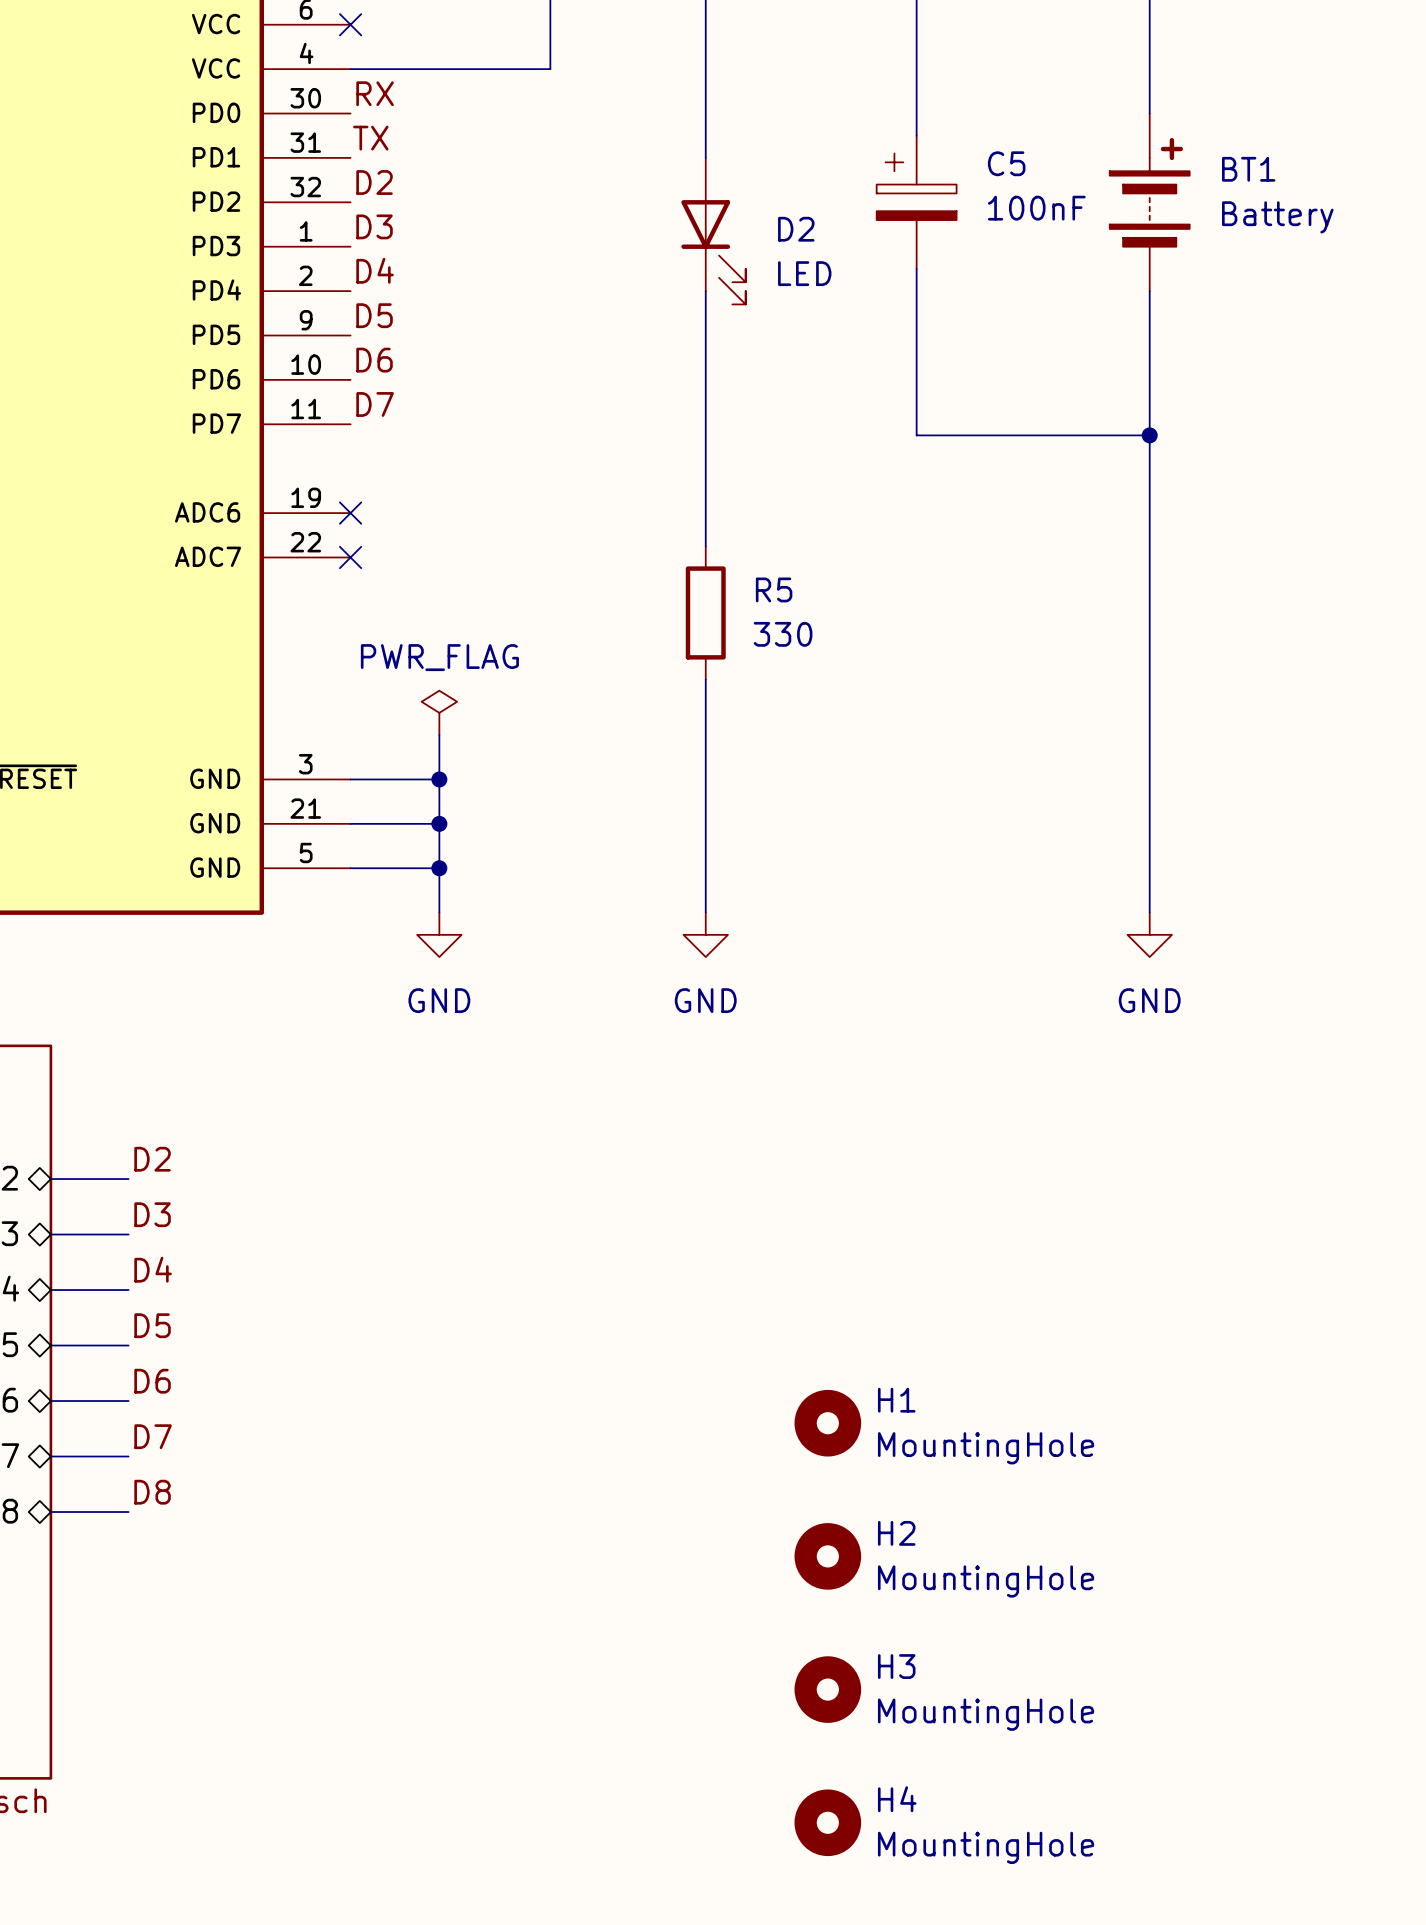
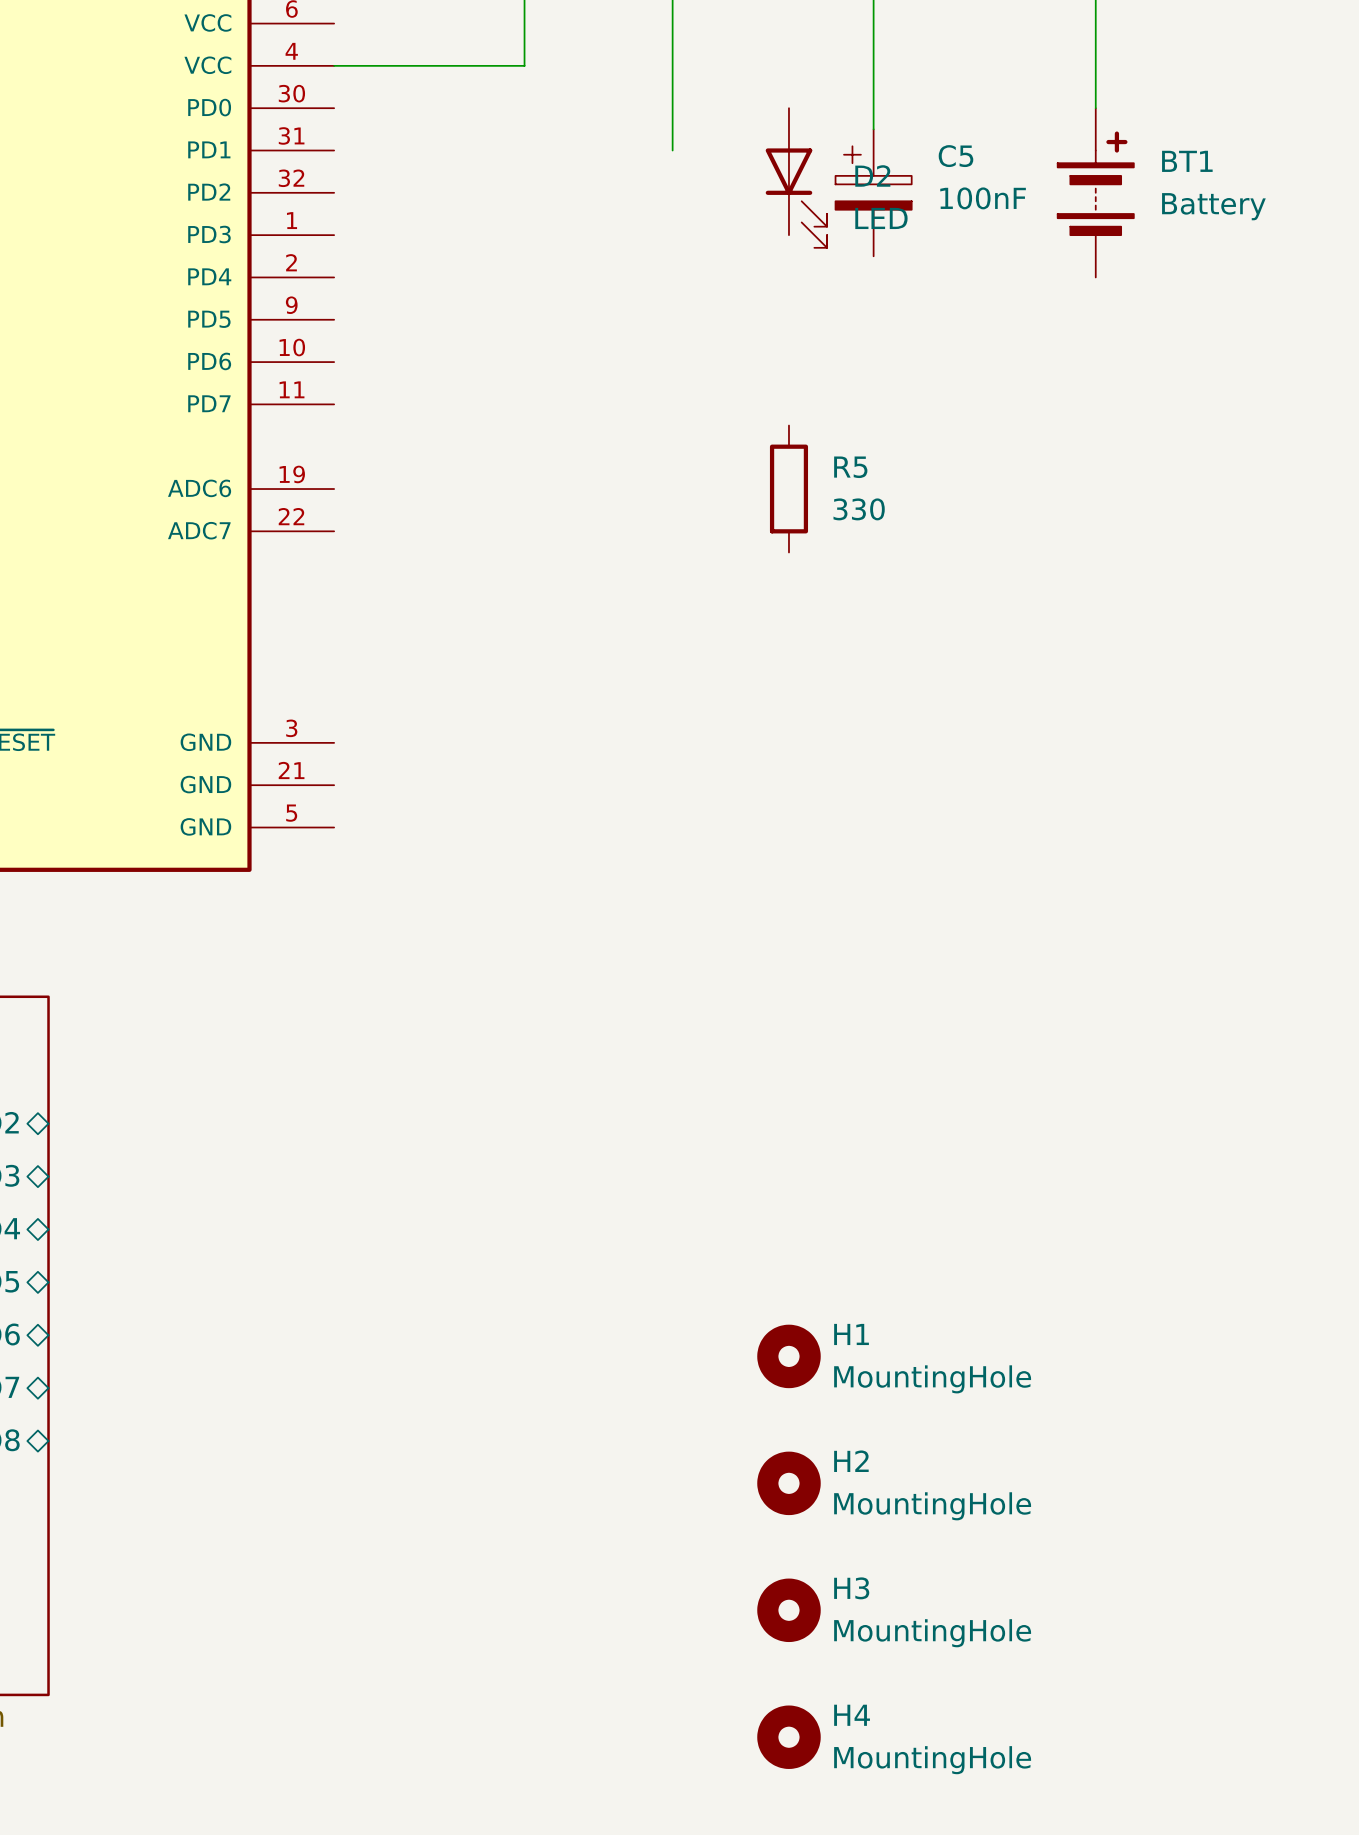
no-connect mark: (350, 24) -> none
label: RX (375, 93) -> none
label: TX (370, 138) -> none
label: D2 (374, 182) -> none
label: D3 (374, 226) -> none
D2 position: (713, 231) -> (796, 178)
wire: (916, 268) (916, 435) (1149, 435) -> none
label: D4 (375, 270) -> none
wire: (705, 291) (705, 546) -> none
wire: (1149, 291) (1149, 912) -> none
label: D5 (374, 315) -> none
label: D6 (374, 360) -> none
label: D7 (375, 404) -> none
junction: (1149, 435) -> none
no-connect mark: (350, 513) -> none
no-connect mark: (350, 557) -> none
R5 position: (705, 612) -> (788, 489)
wire: (705, 679) (705, 912) -> none
power symbol: PWR_FLAG (439, 712) -> none
wire: (439, 735) (439, 912) -> none
wire: (350, 779) (439, 779) -> none
junction: (439, 779) -> none
wire: (350, 823) (439, 823) -> none
junction: (439, 823) -> none
wire: (350, 868) (439, 868) -> none
junction: (439, 868) -> none
power symbol: GND (439, 934) -> none
power symbol: GND (705, 934) -> none
power symbol: GND (1149, 934) -> none
label: D2 (152, 1159) -> none
wire: (50, 1179) (128, 1179) -> none
label: D3 (152, 1214) -> none
wire: (50, 1234) (128, 1234) -> none
label: D4 (153, 1269) -> none
wire: (50, 1290) (128, 1290) -> none
label: D5 (152, 1325) -> none
wire: (50, 1345) (128, 1345) -> none
label: D6 (152, 1381) -> none
wire: (50, 1401) (128, 1401) -> none
label: D7 (153, 1436) -> none
wire: (50, 1456) (128, 1456) -> none
label: D8 (152, 1492) -> none
wire: (50, 1512) (128, 1512) -> none

